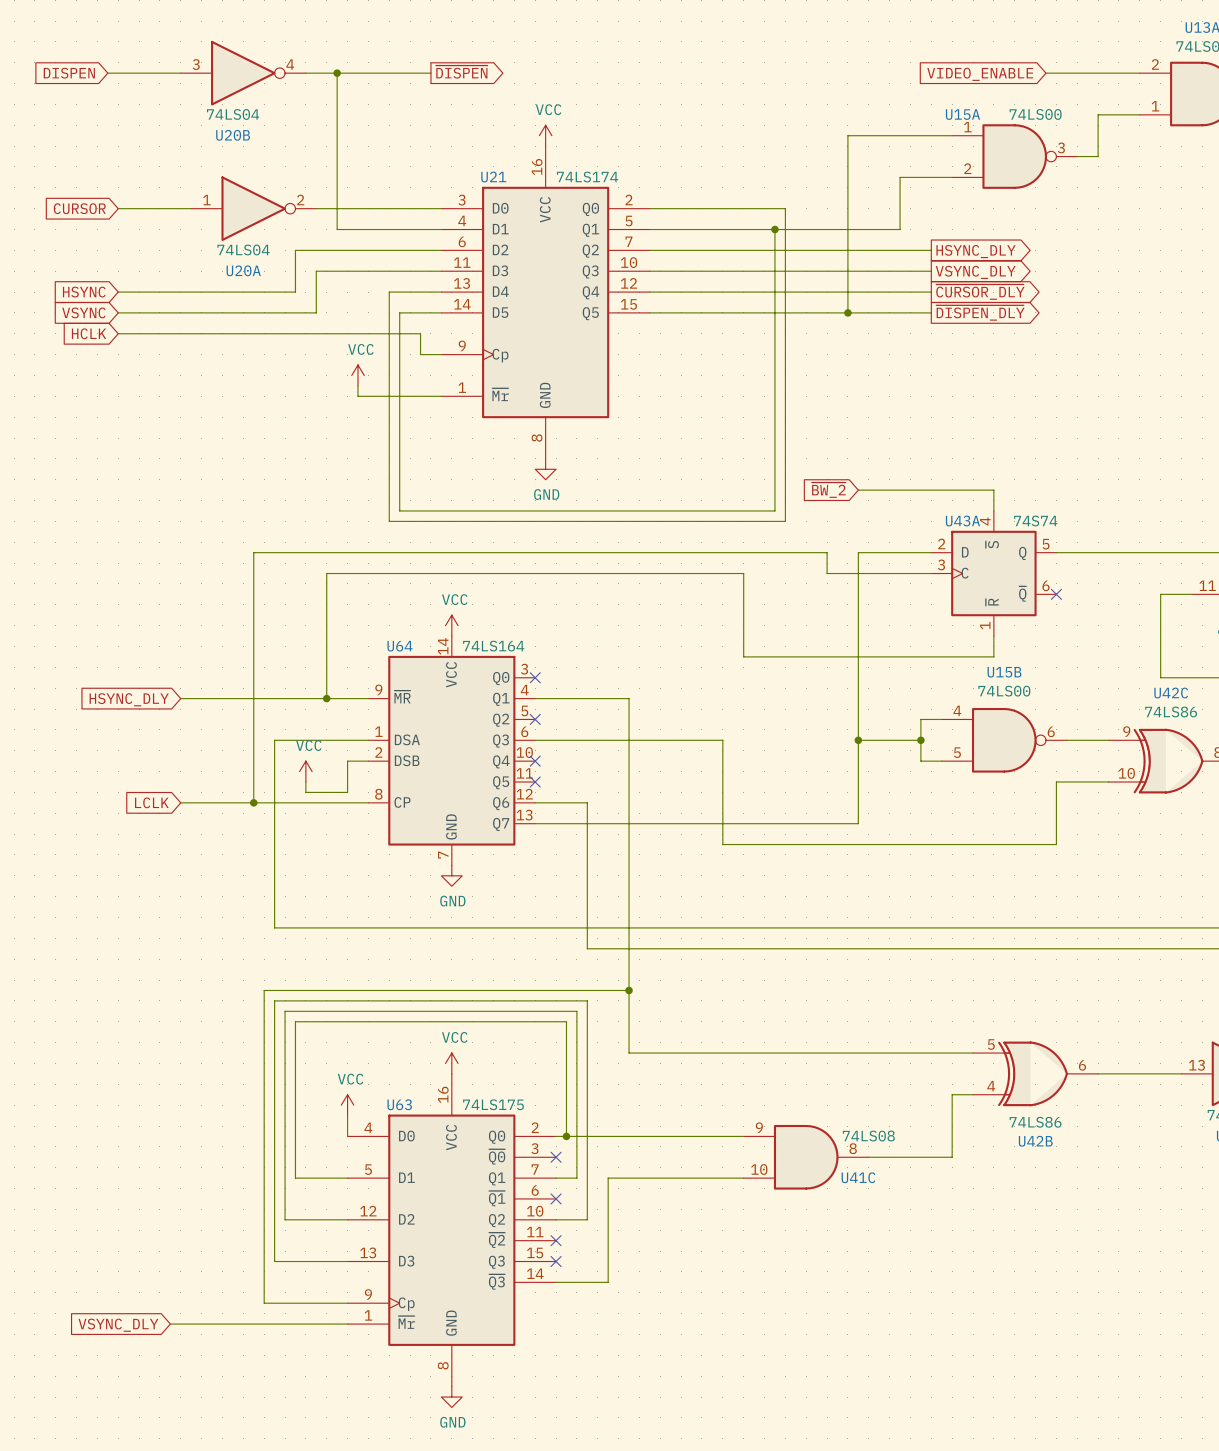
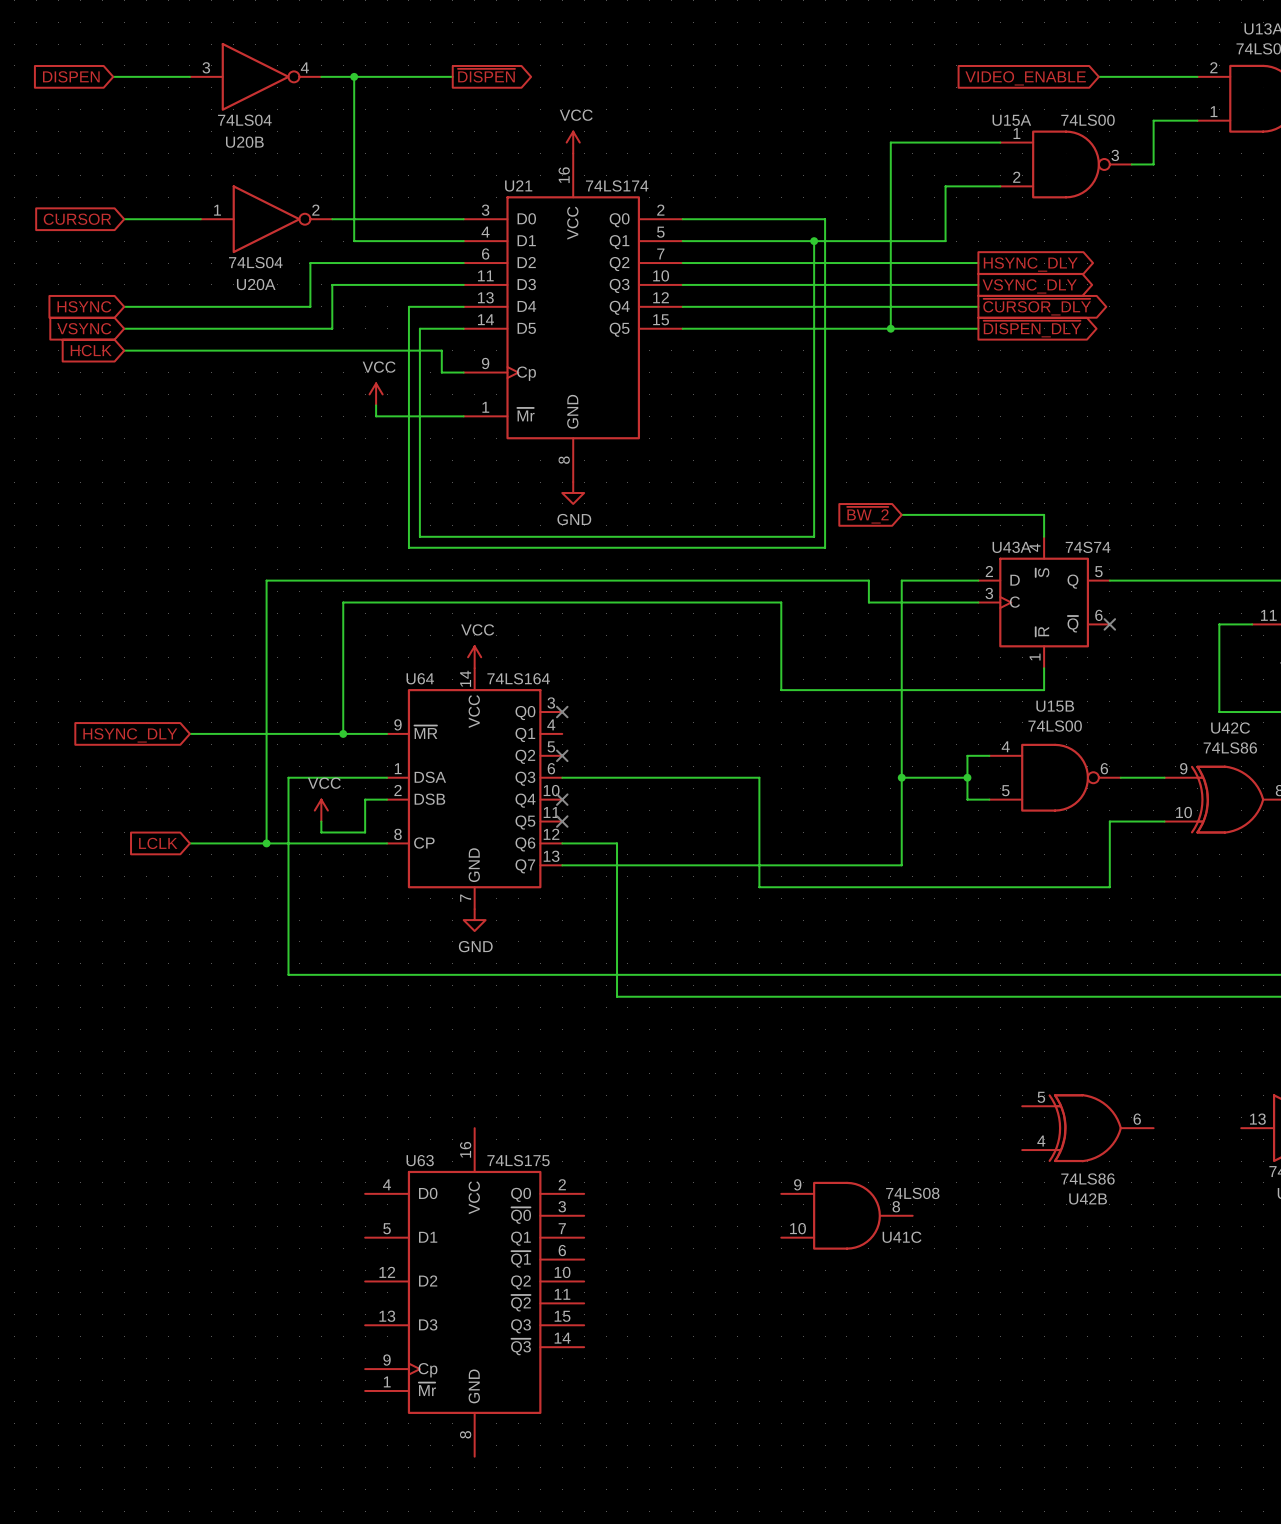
wire: (535, 698) (629, 698) (629, 1053) (973, 1053) -> none
wire: (629, 990) (264, 990) (264, 1303) (347, 1303) -> none
junction: (629, 990) -> none
power symbol: VCC (451, 1063) -> none
wire: (1098, 1073) (1181, 1073) -> none
wire: (973, 1094) (952, 1094) (952, 1157) (868, 1157) -> none
power symbol: VCC (347, 1105) -> none
wire: (347, 1115) (347, 1136) -> none
wire: (556, 1136) (743, 1136) -> none
wire: (566, 1136) (566, 1021) (295, 1021) (295, 1178) (347, 1178) -> none
junction: (566, 1136) -> none
no-connect mark: (556, 1157) -> none
wire: (556, 1178) (576, 1178) (576, 1011) (285, 1011) (285, 1219) (347, 1219) -> none
wire: (743, 1178) (608, 1178) (608, 1282) (556, 1282) -> none
no-connect mark: (556, 1198) -> none
wire: (556, 1219) (587, 1219) (587, 1000) (274, 1000) (274, 1261) (347, 1261) -> none
no-connect mark: (556, 1240) -> none
no-connect mark: (556, 1261) -> none
wire: (170, 1324) (347, 1324) -> none
global label: VSYNC_DLY (118, 1325) -> none
power symbol: GND (451, 1397) -> none

